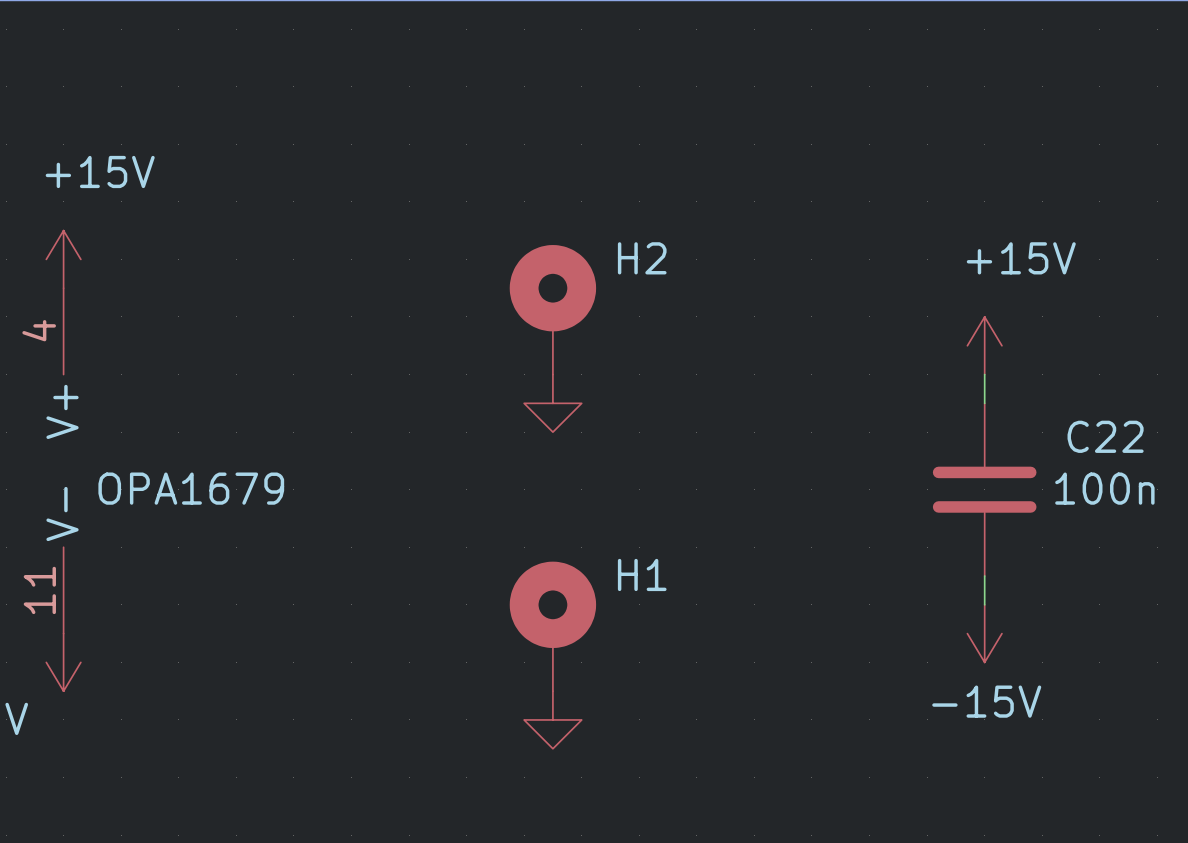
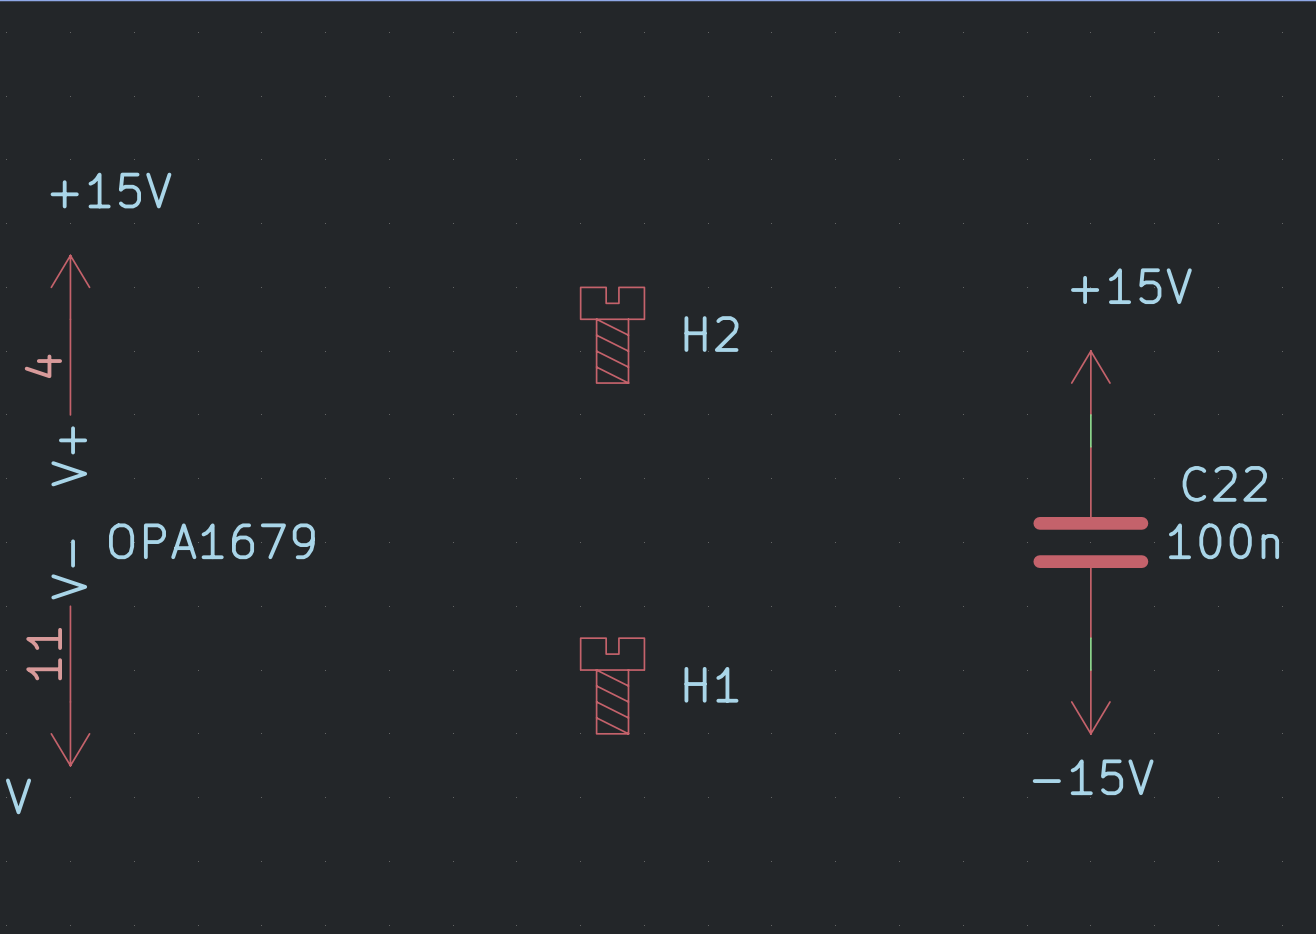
H2 symbol: [509, 245, 597, 375] -> [580, 287, 645, 384]
H2 name position: H2 (642, 258) -> H2 (711, 334)
power symbol: (552, 403) -> none
H1 symbol: [509, 561, 597, 692] -> [580, 638, 645, 734]
H1 name position: H1 (642, 574) -> H1 (711, 684)
power symbol: (552, 719) -> none

